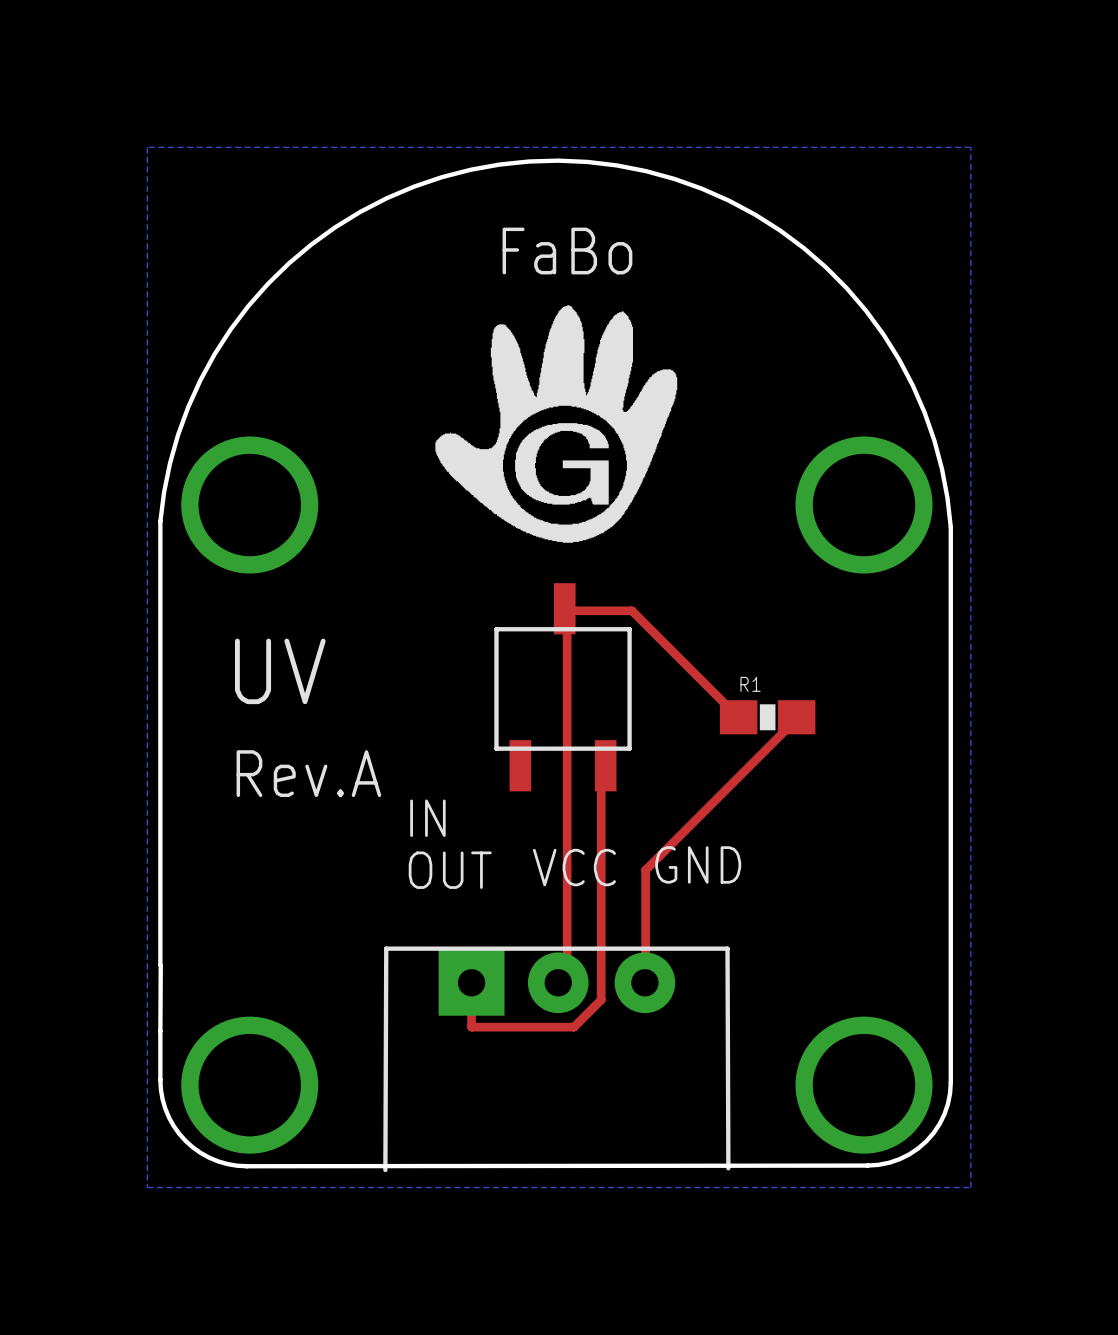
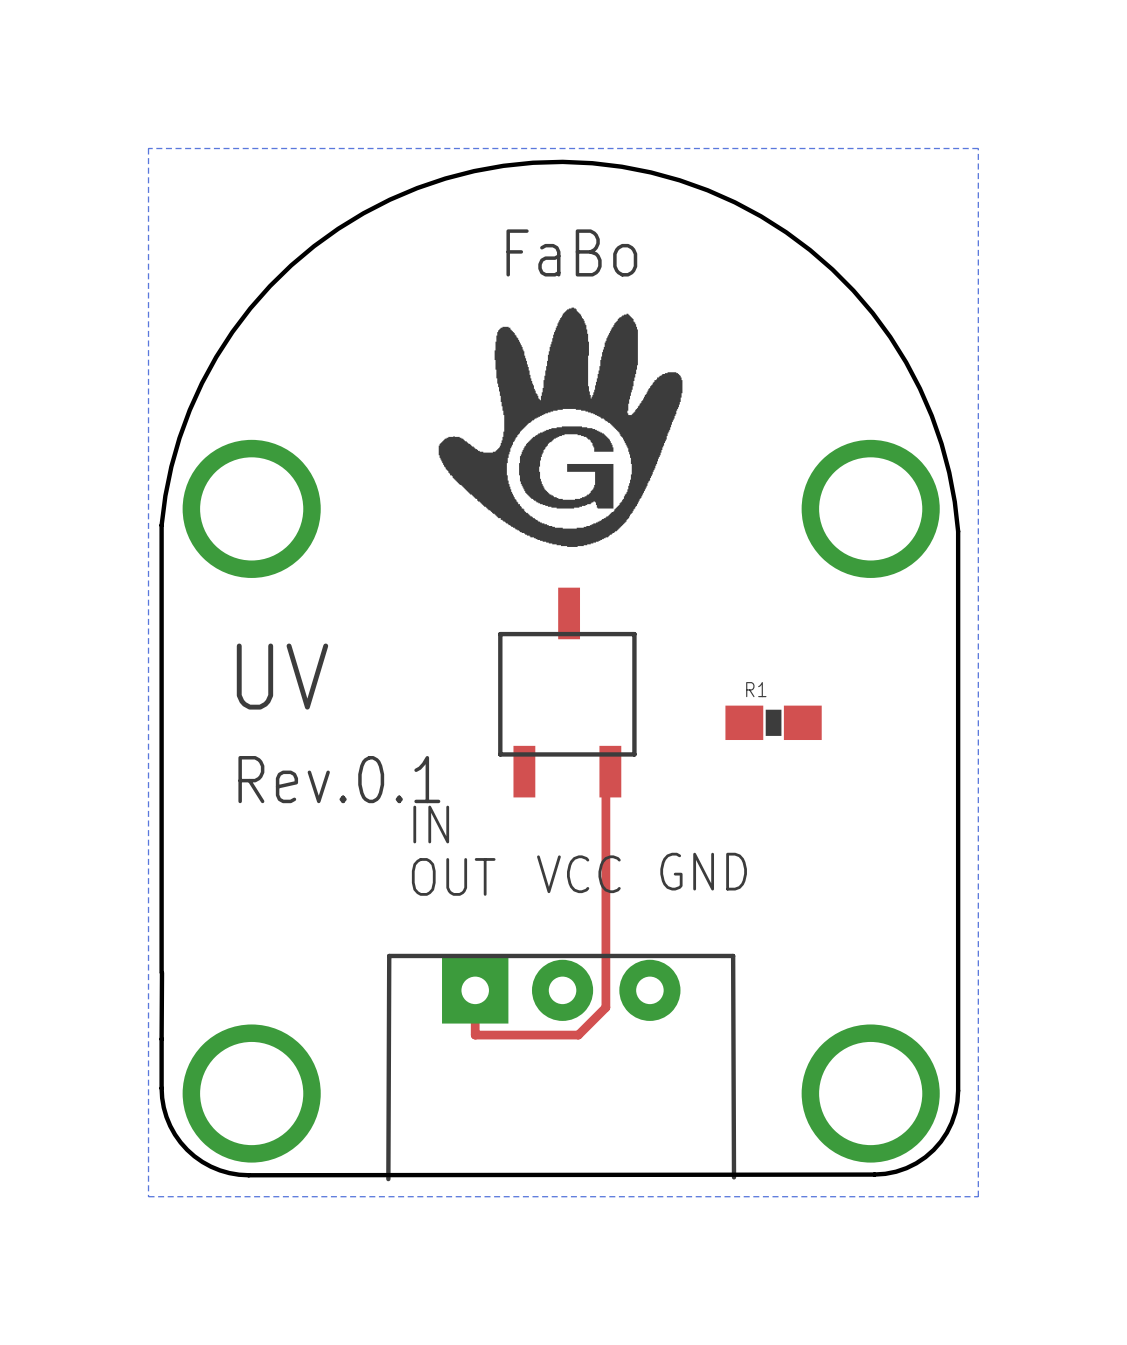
top track: (738, 717) (631, 610) (567, 610) (564, 608) (567, 614) (567, 975) (558, 982) -> none
top track: (796, 717) (645, 870) (645, 982) -> none
text: Rev.A (308, 773) -> Rev.0.1 (339, 779)

